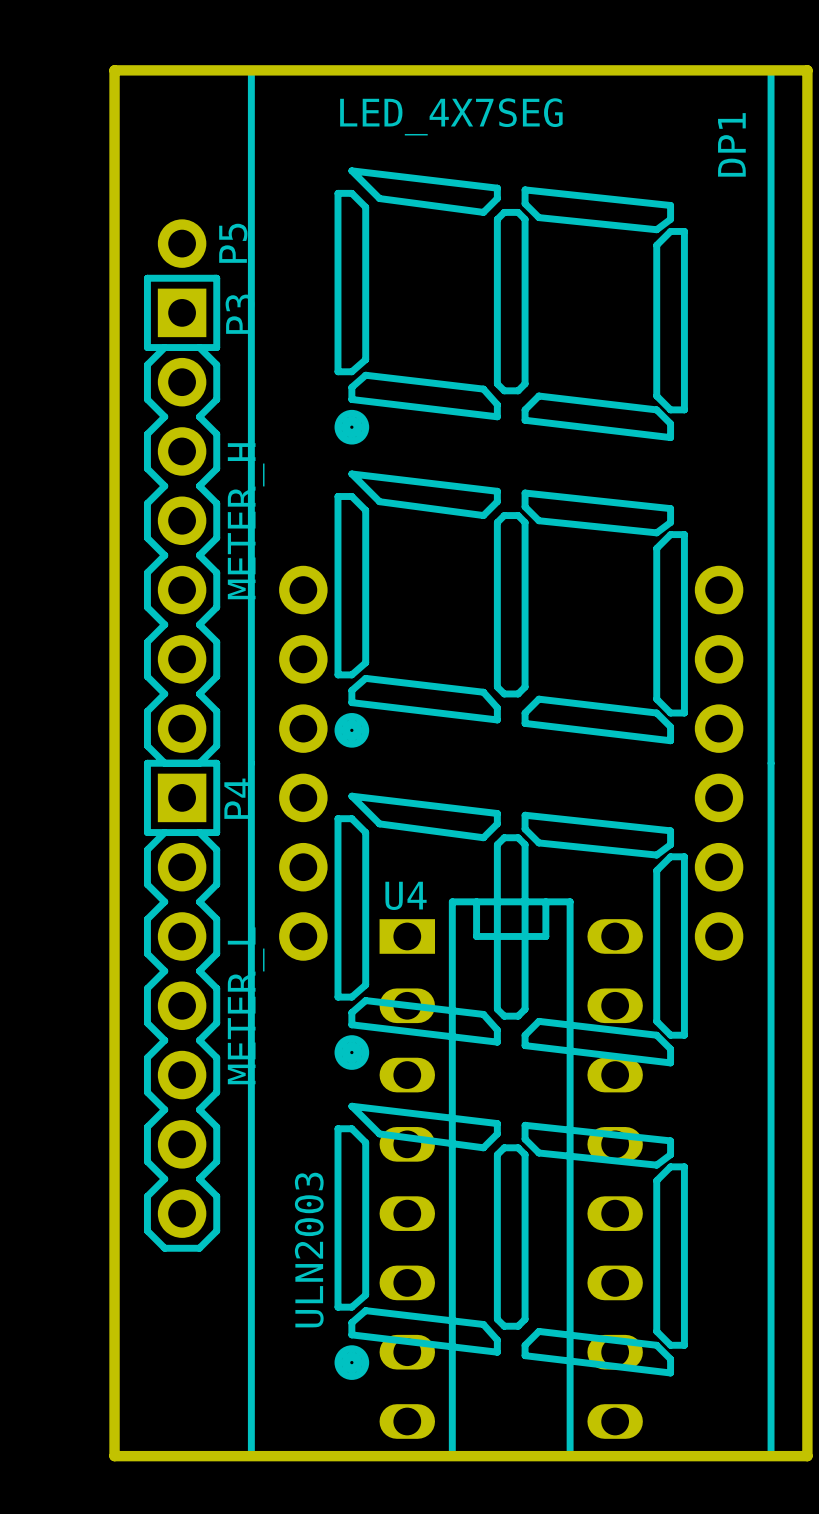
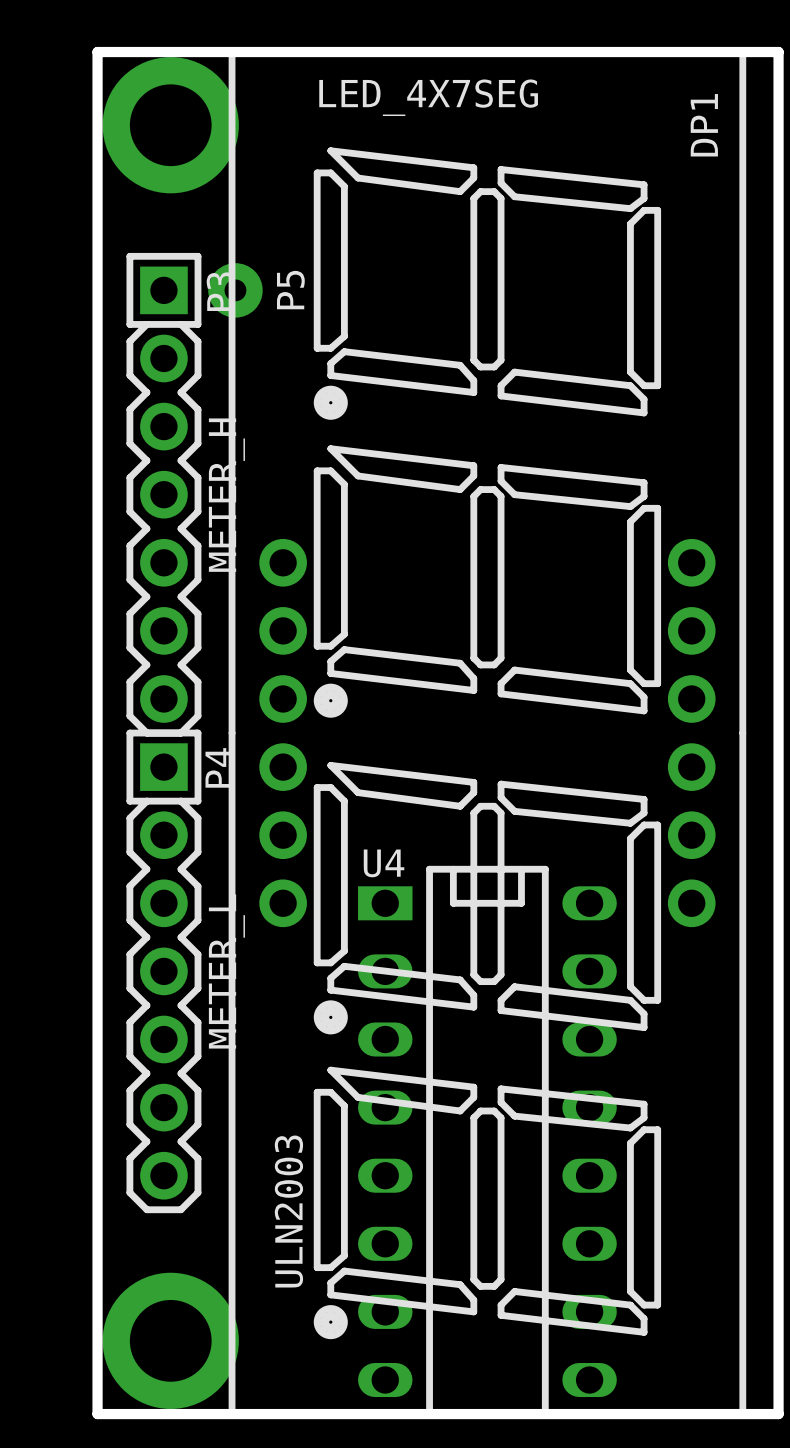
part: none -> (170, 125)
P5 footprint: [157, 219, 207, 268] -> [208, 263, 263, 318]
part: none -> (170, 1340)

